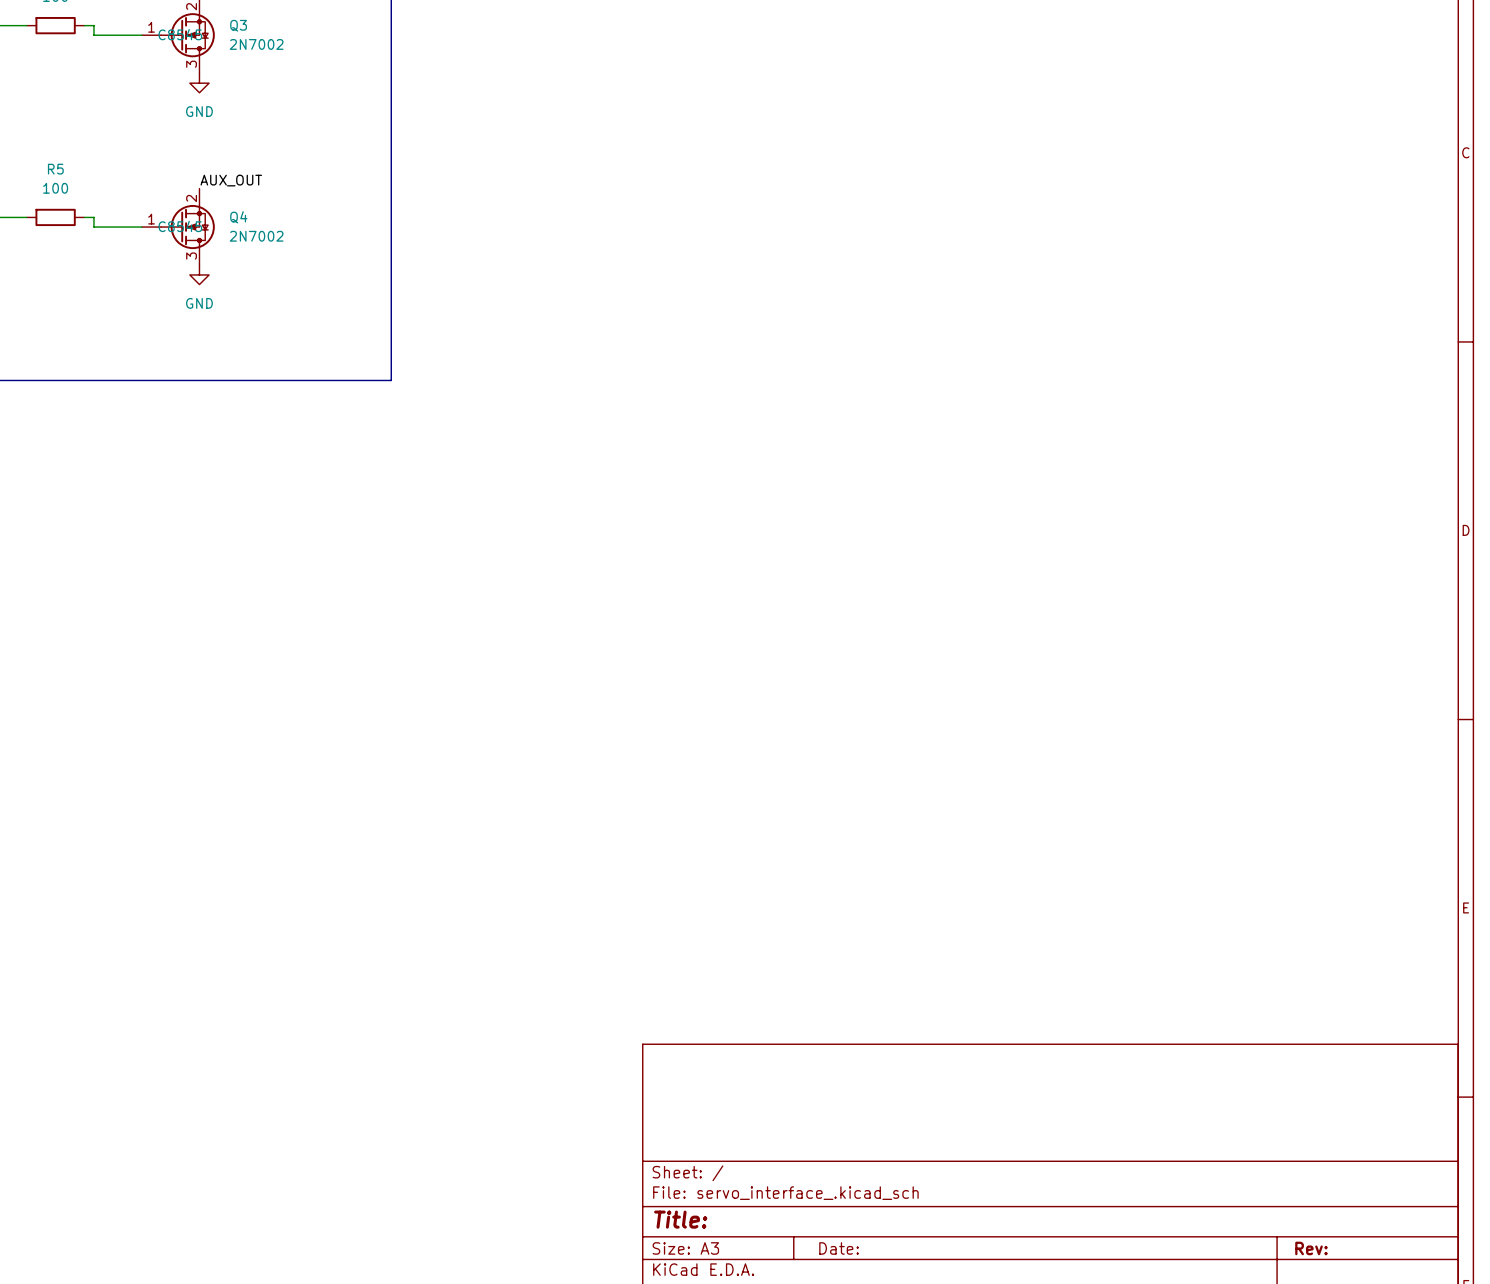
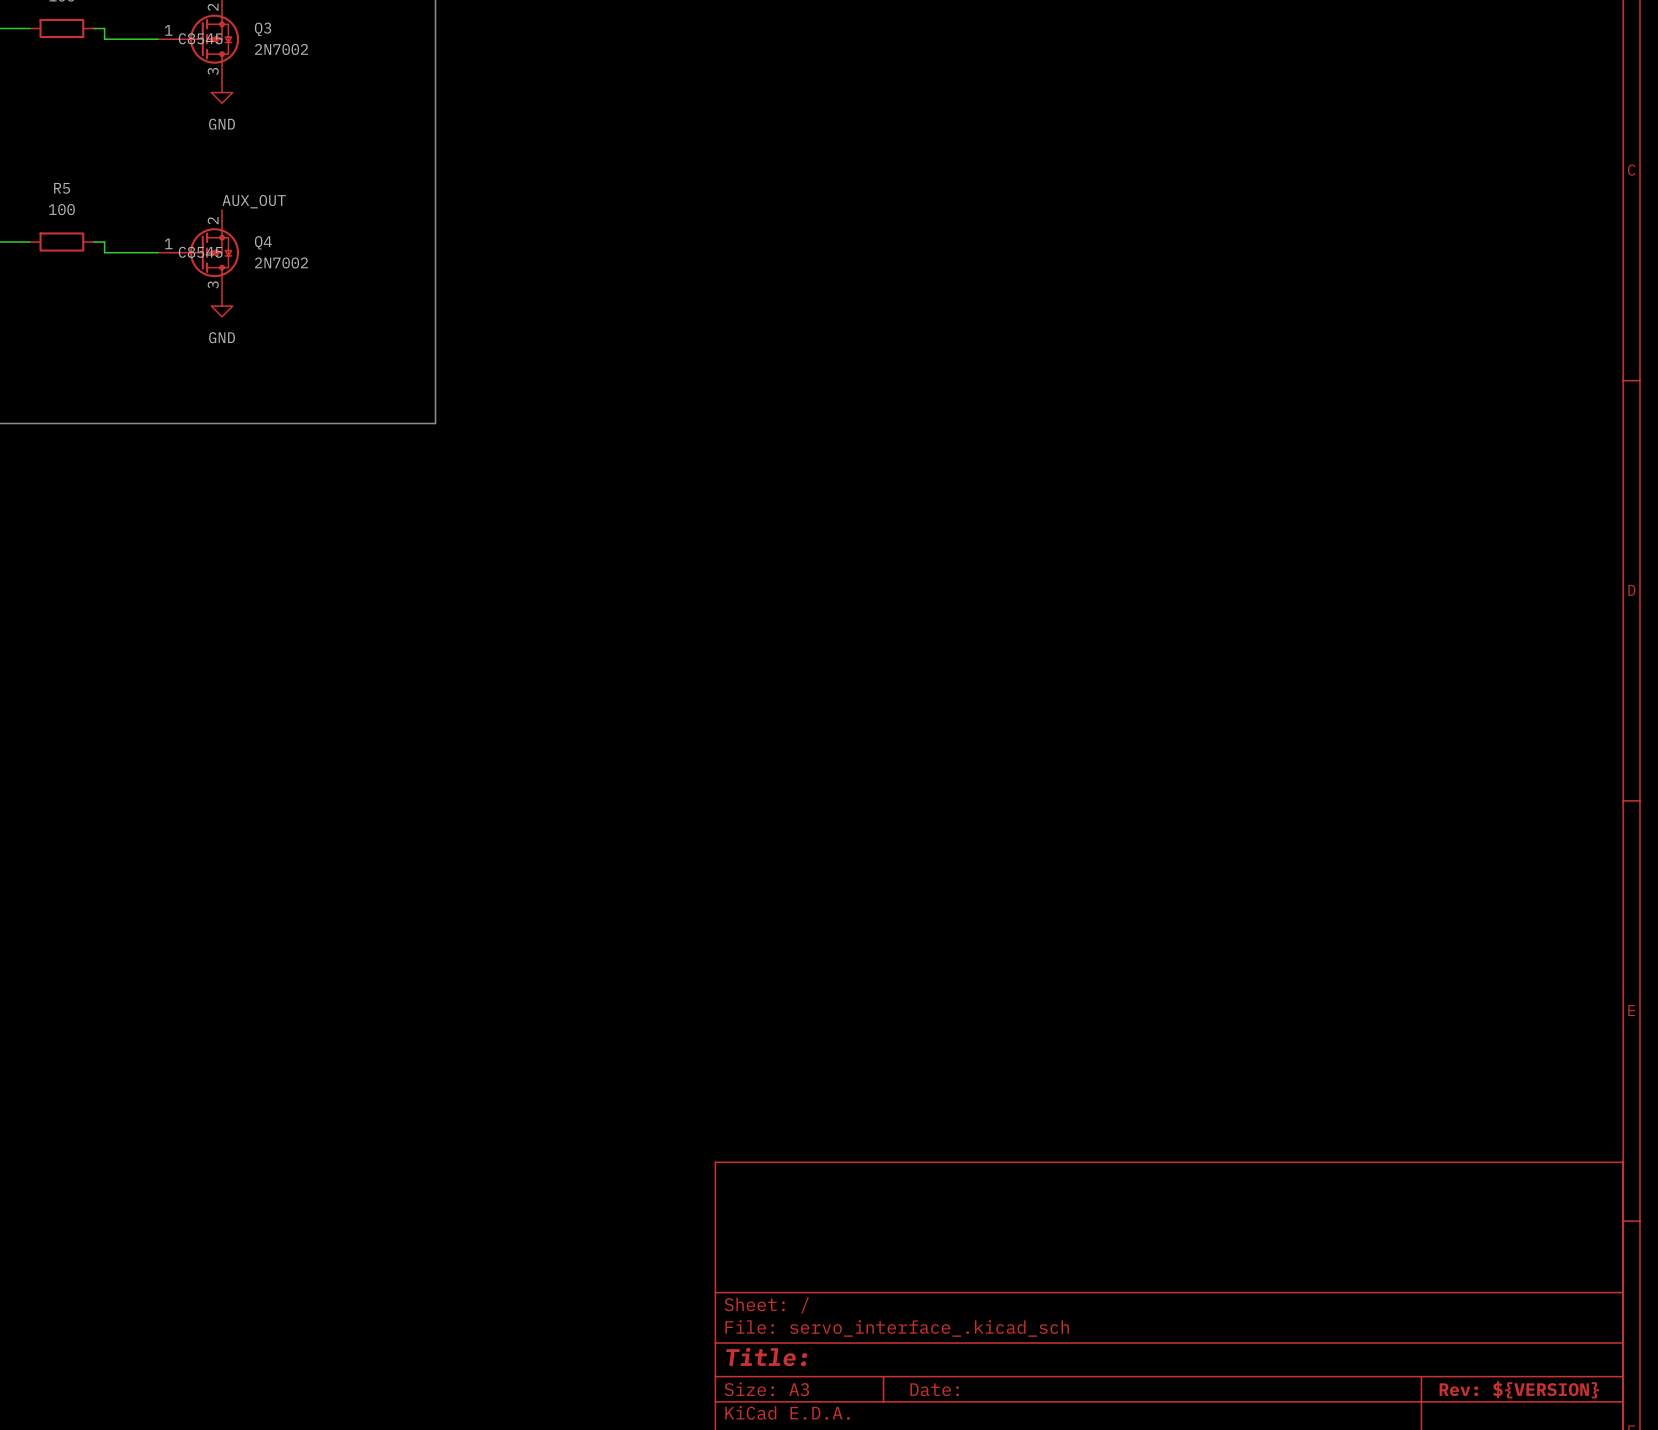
title block: Rev: (1311, 1248) -> Rev: ${VERSION} (1519, 1389)

